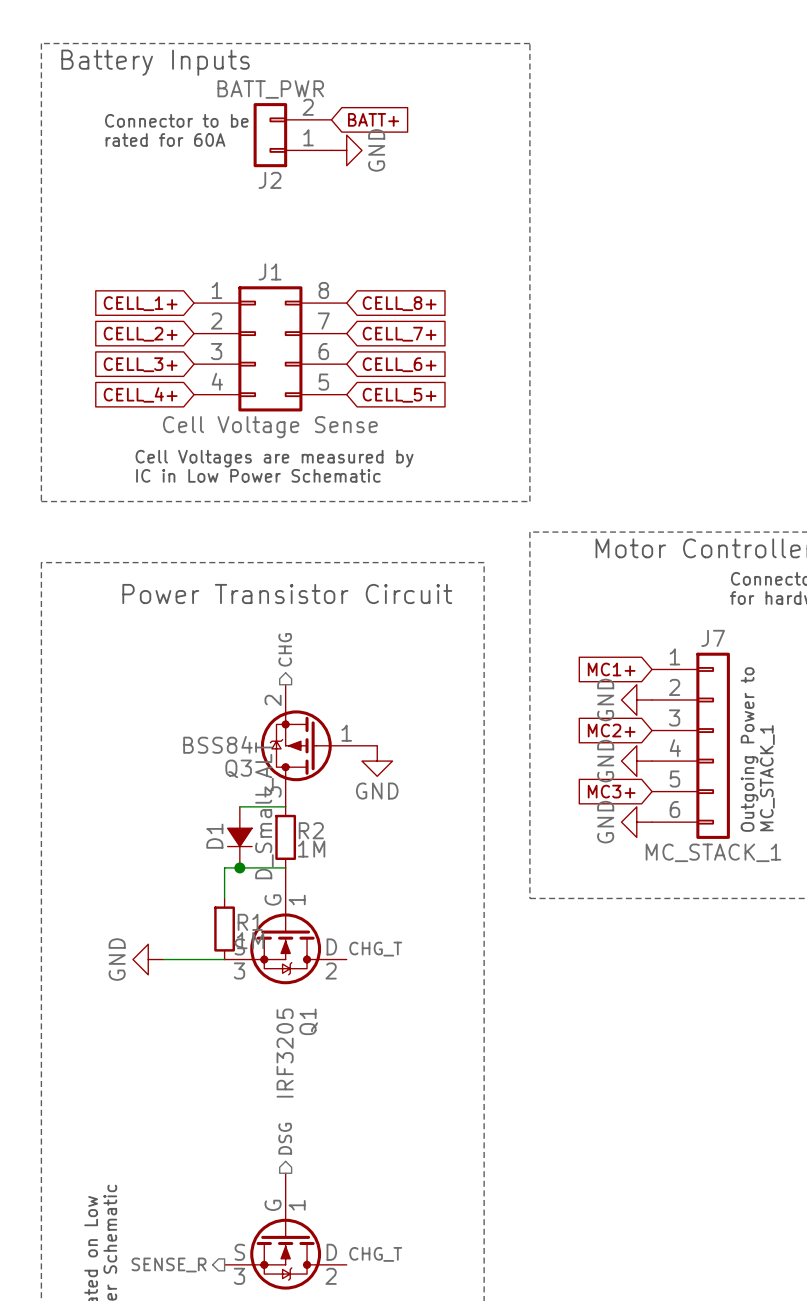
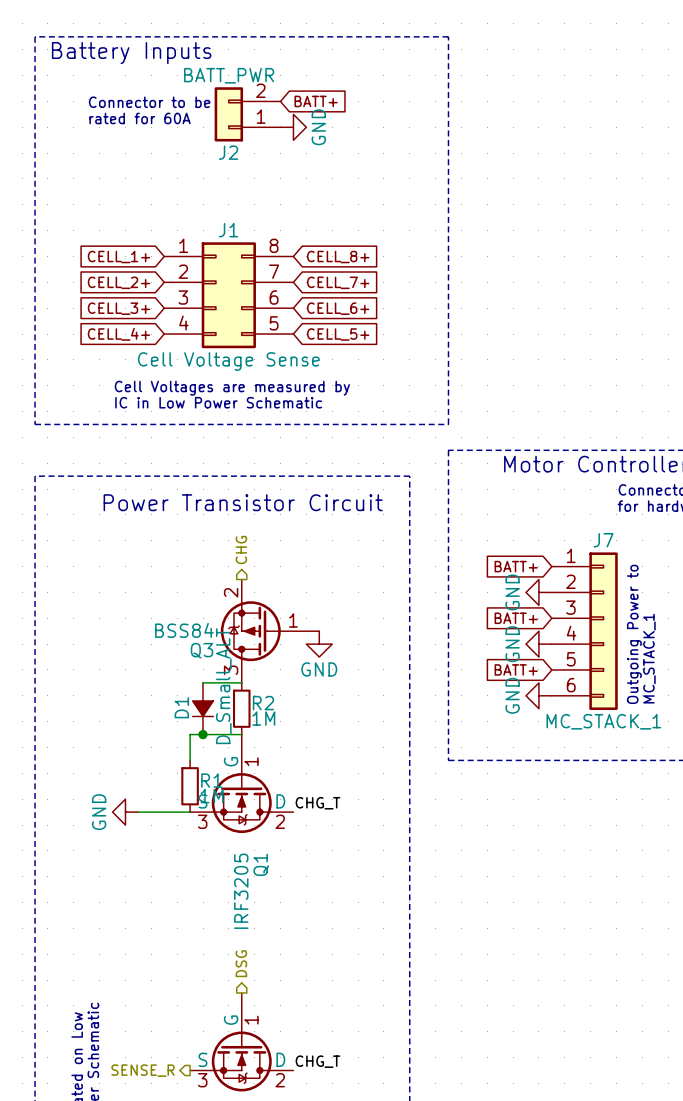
global label: MC1+ (611, 669) -> BATT+ (516, 566)
global label: MC2+ (611, 730) -> BATT+ (516, 618)
global label: MC3+ (611, 791) -> BATT+ (516, 669)

